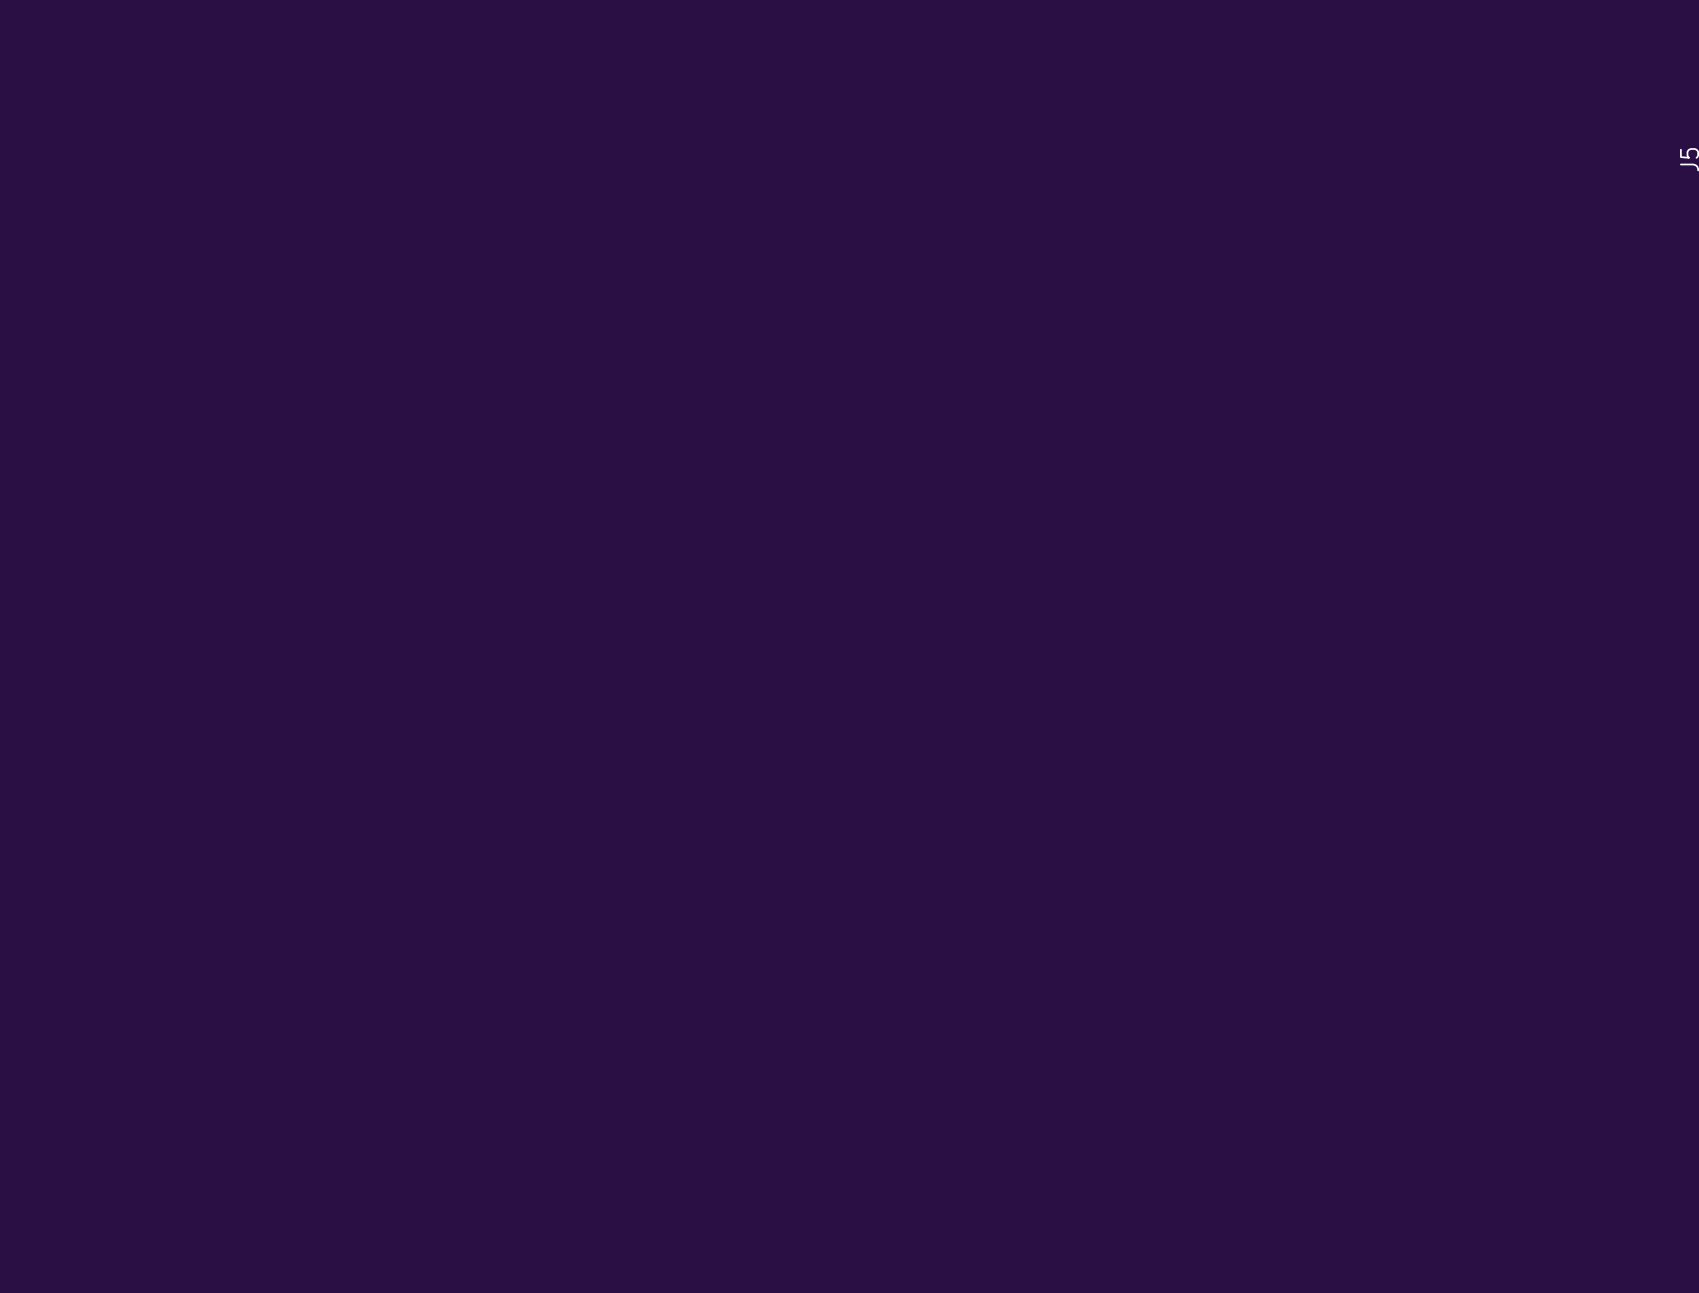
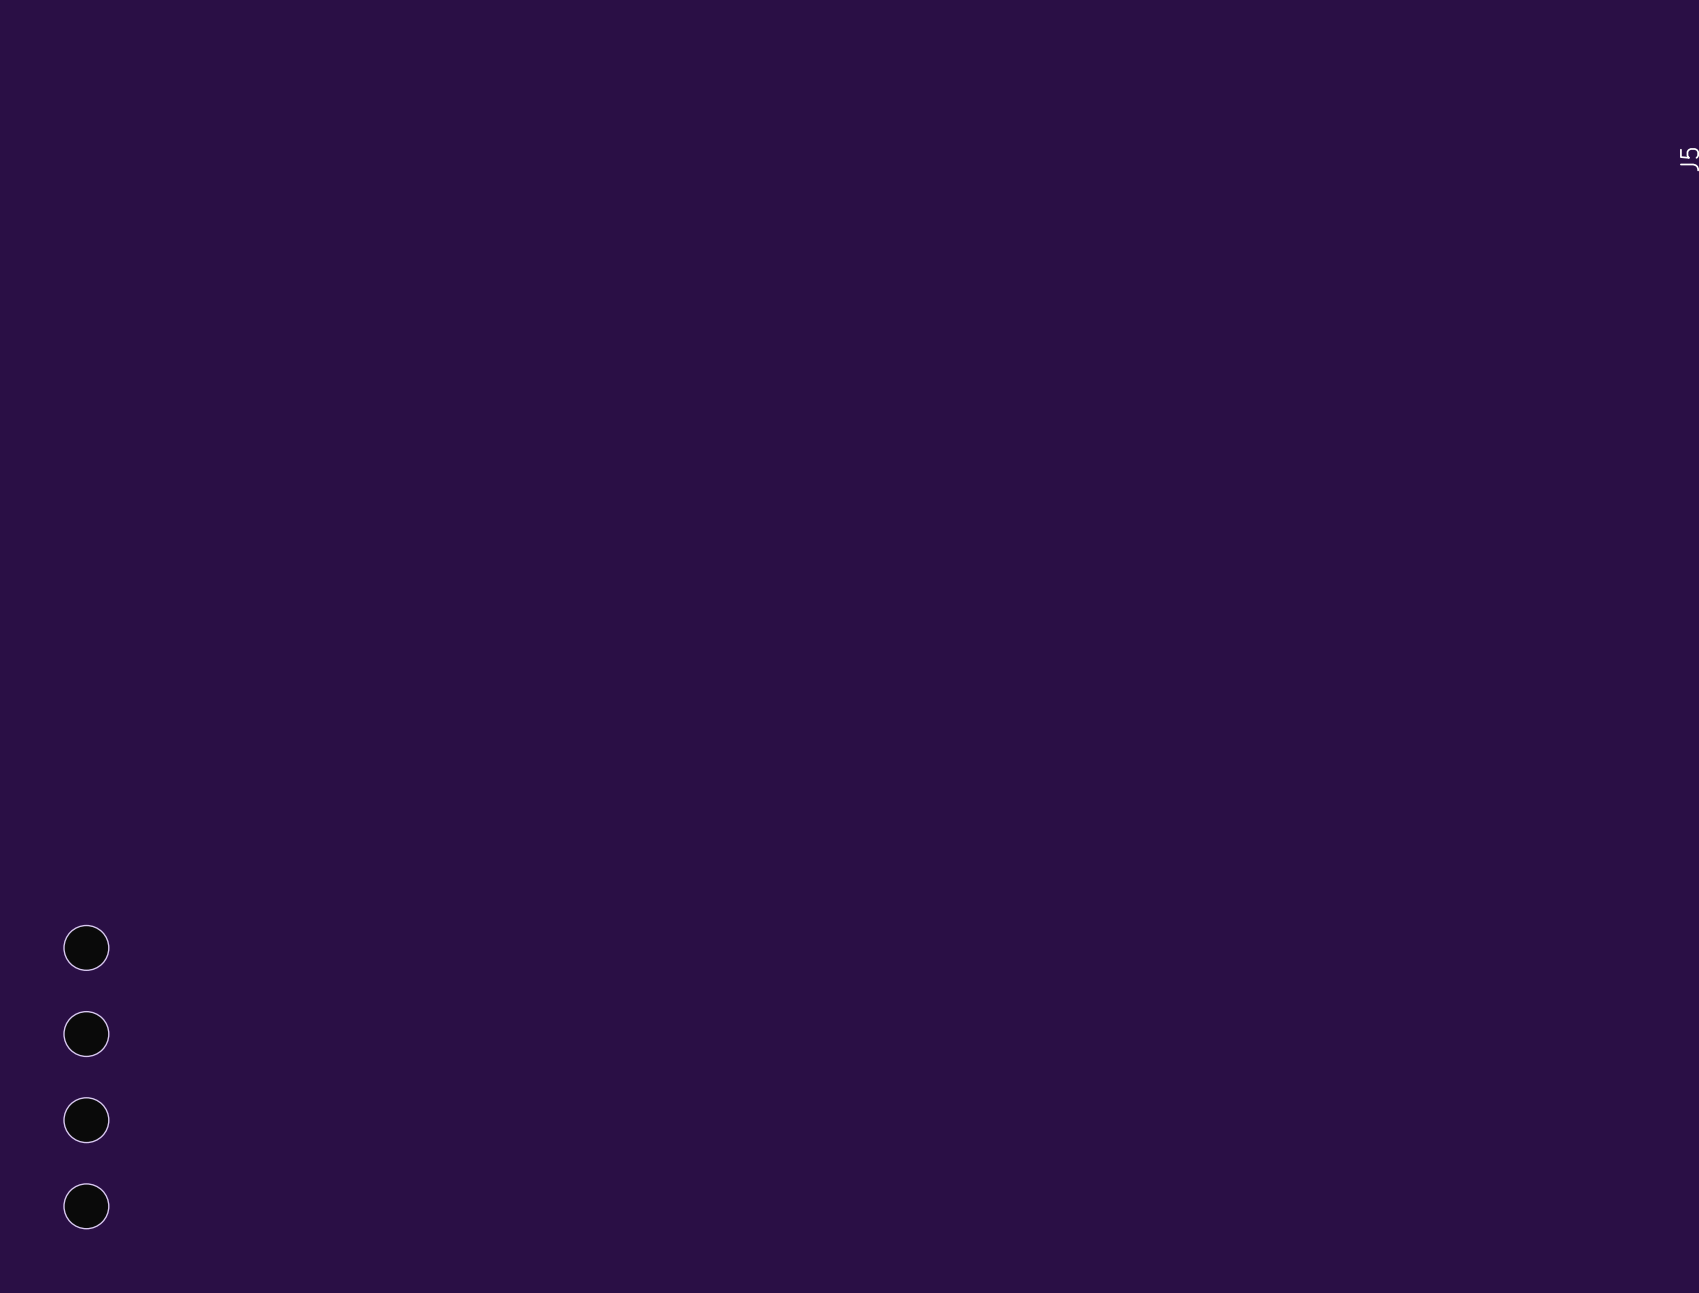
part: none -> (86, 947)
part: none -> (86, 1034)
part: none -> (86, 1120)
part: none -> (86, 1206)

